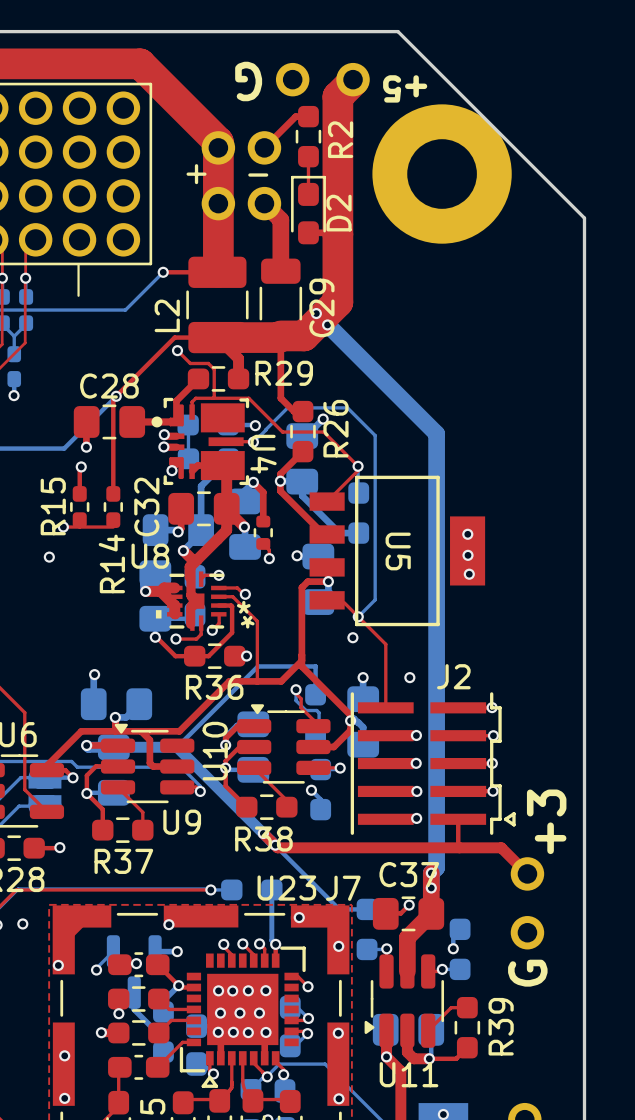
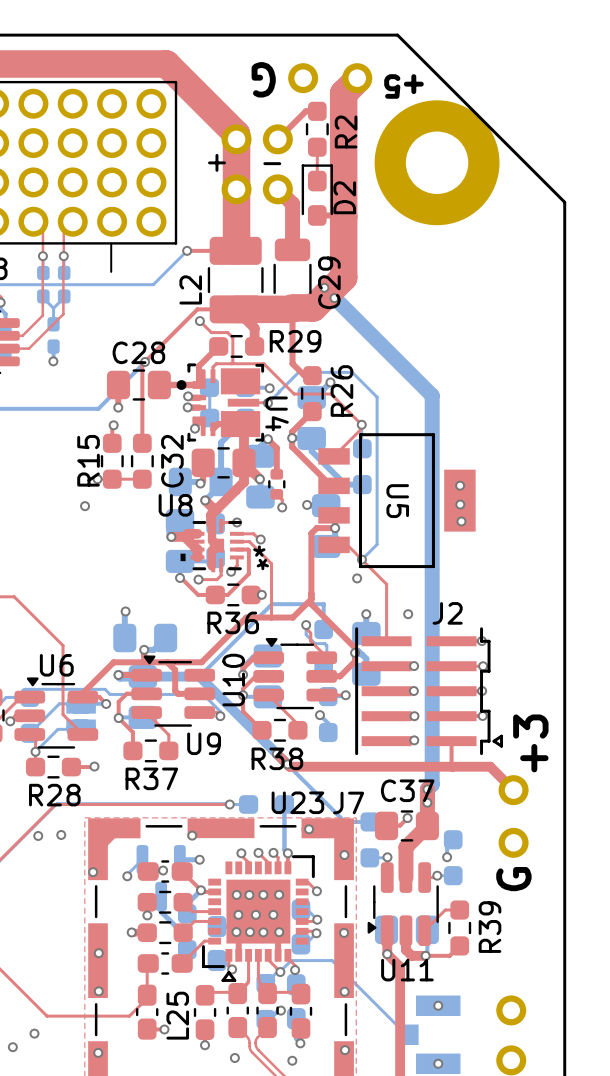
R15 footprint: [70, 486, 90, 528] -> [100, 433, 124, 489]
R14: (113, 507) -> none
part: none -> (142, 461)

